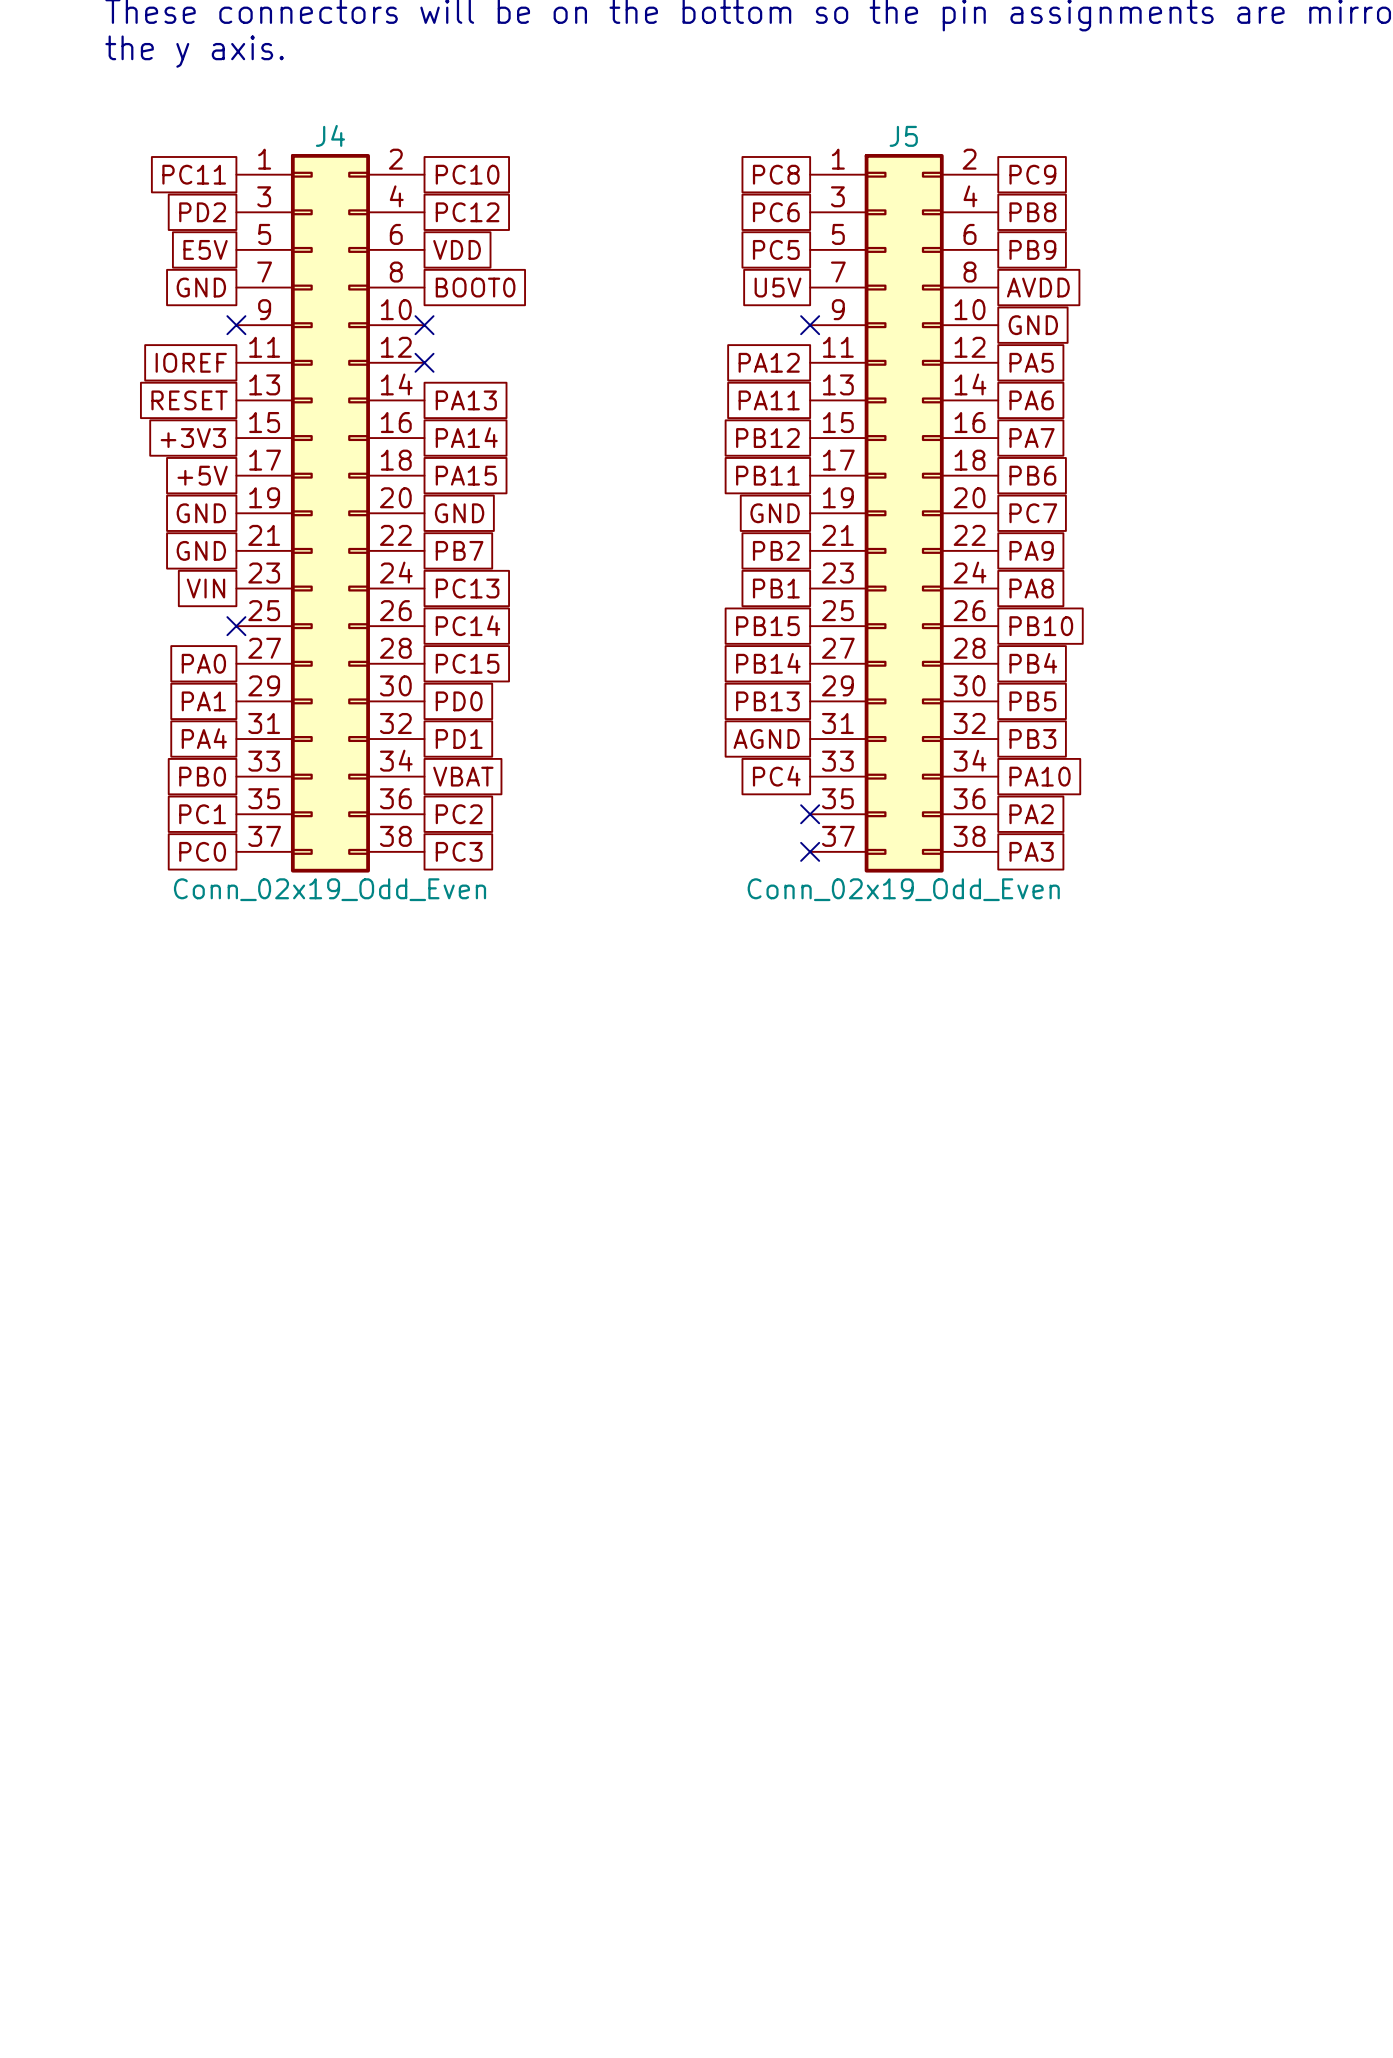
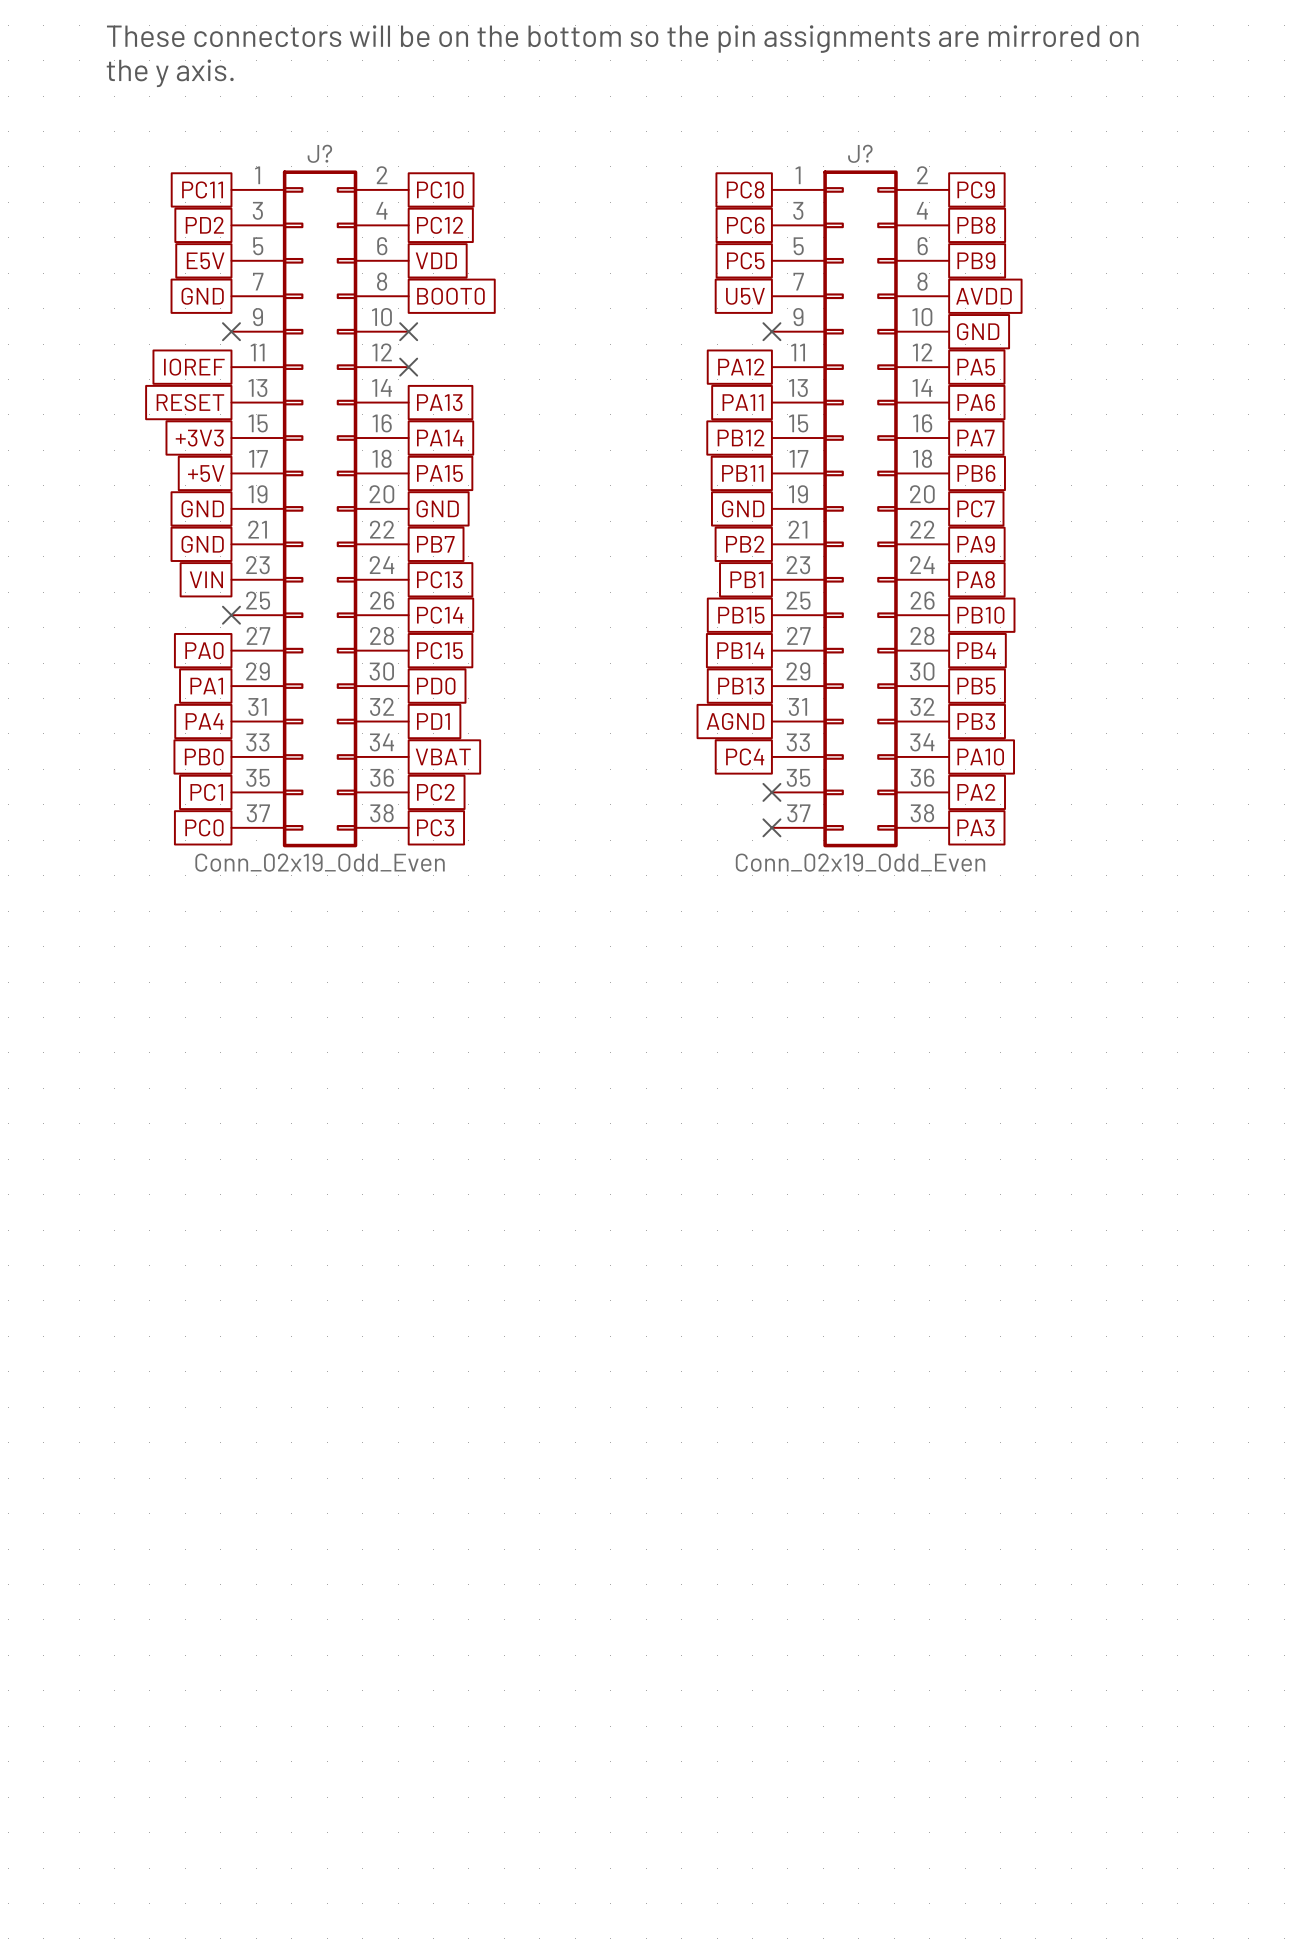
J4 name: J4 (330, 135) -> J? (319, 153)
J5 name: J5 (903, 136) -> J? (860, 153)

